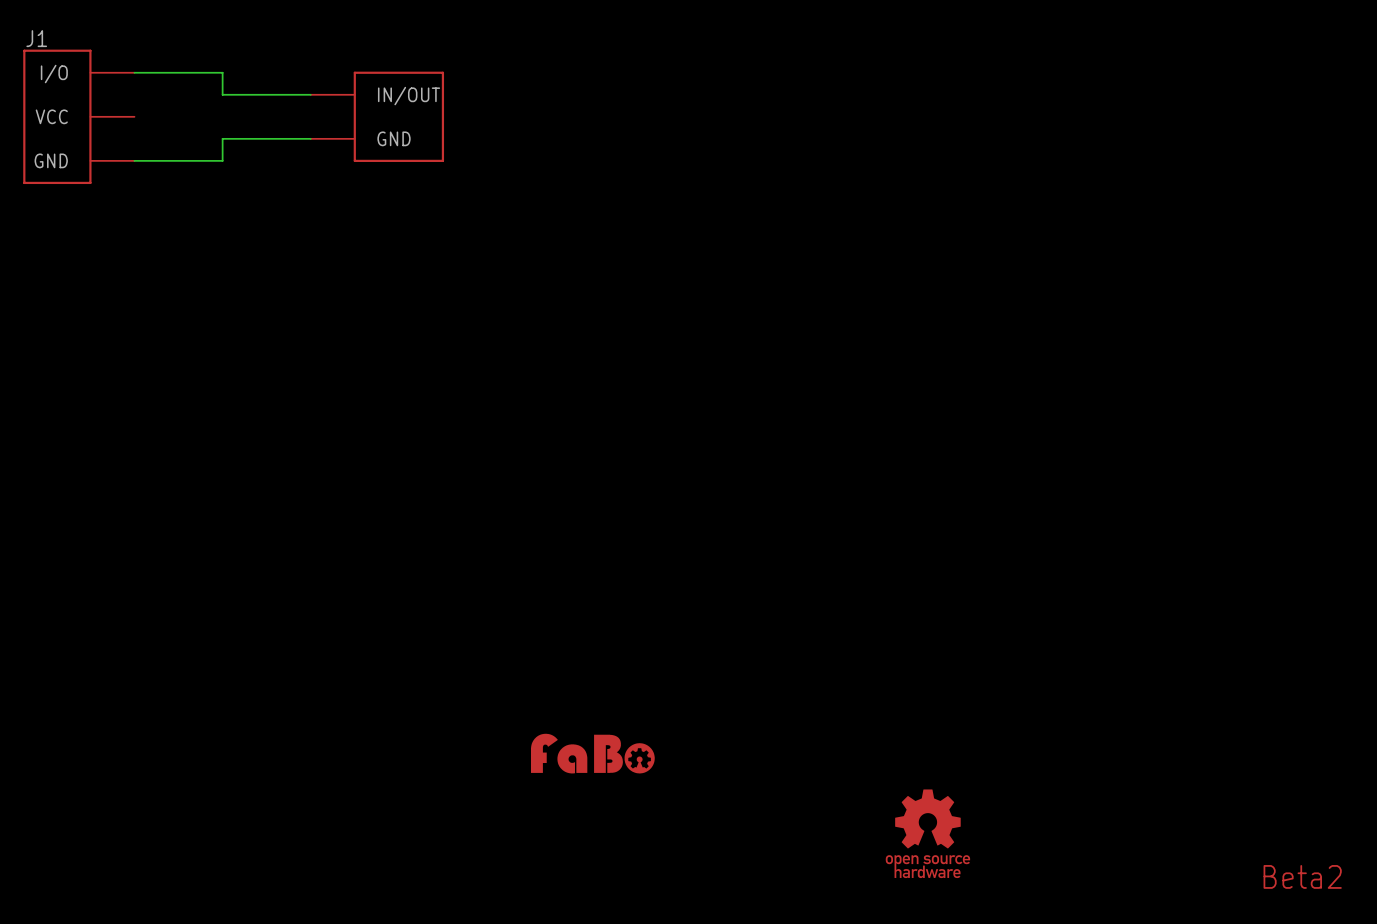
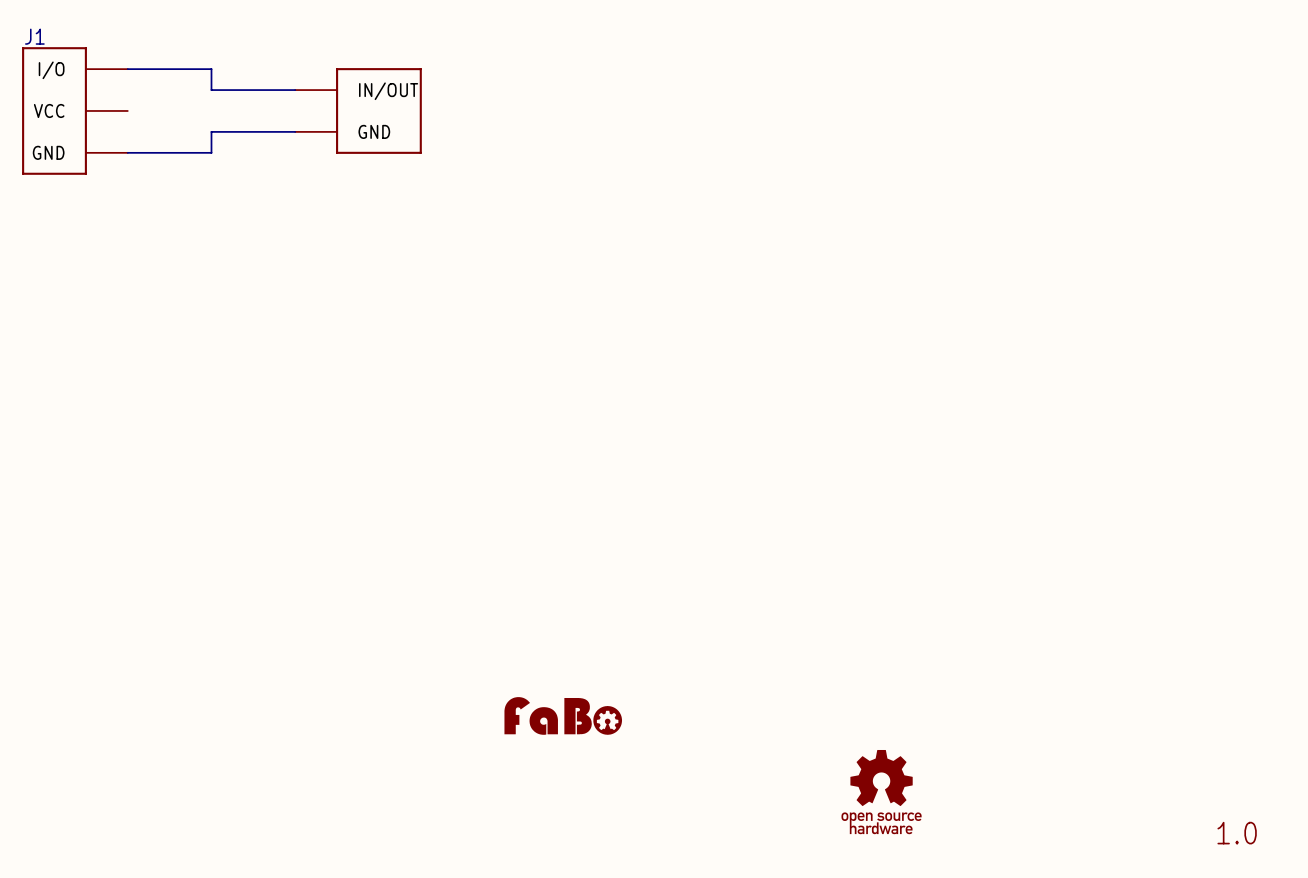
text: Beta2 (1302, 876) -> 1.0 (1237, 833)

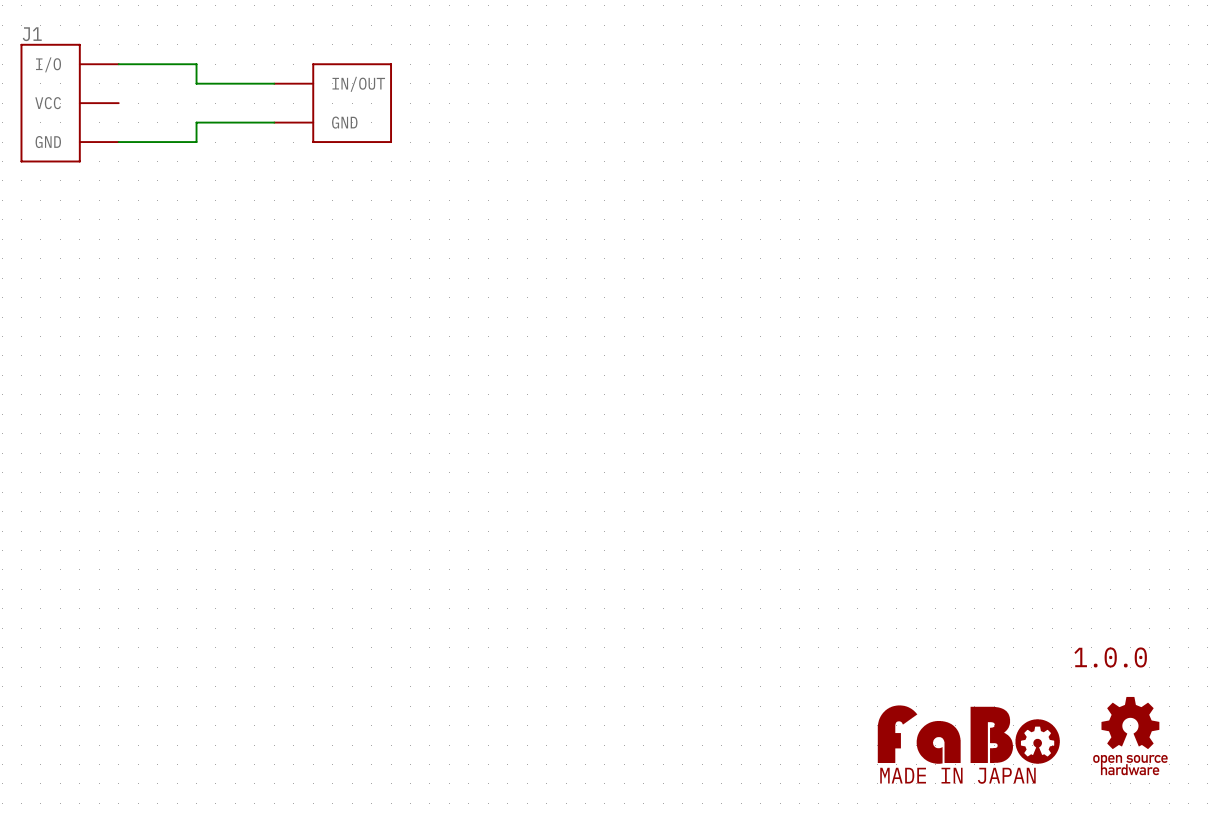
text: none -> 1.0.0 (1110, 657)
part: (563, 715) -> none
part: none -> (968, 734)
part: (881, 792) -> none
part: none -> (1130, 736)
text: 1.0 (1237, 833) -> none

